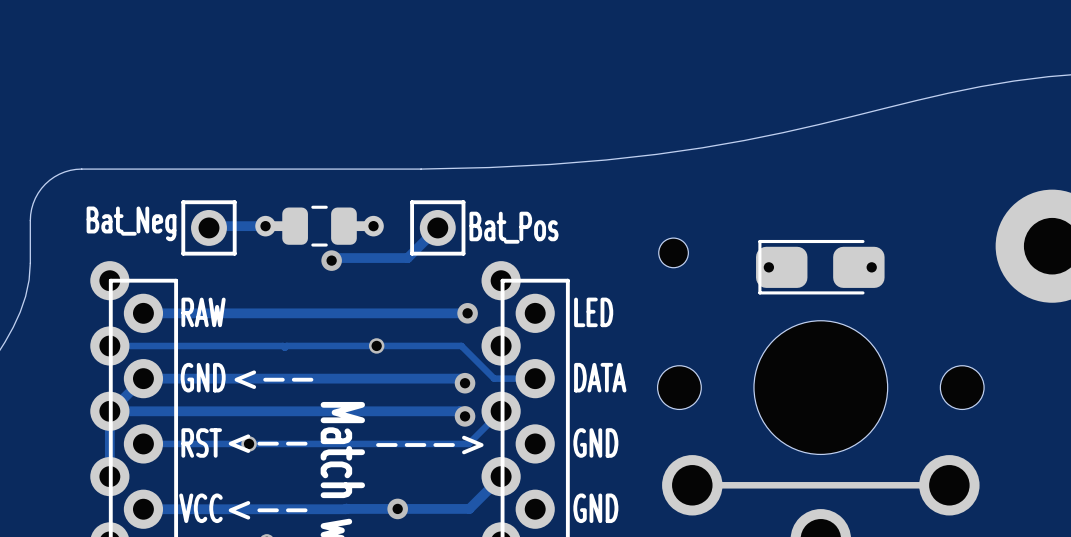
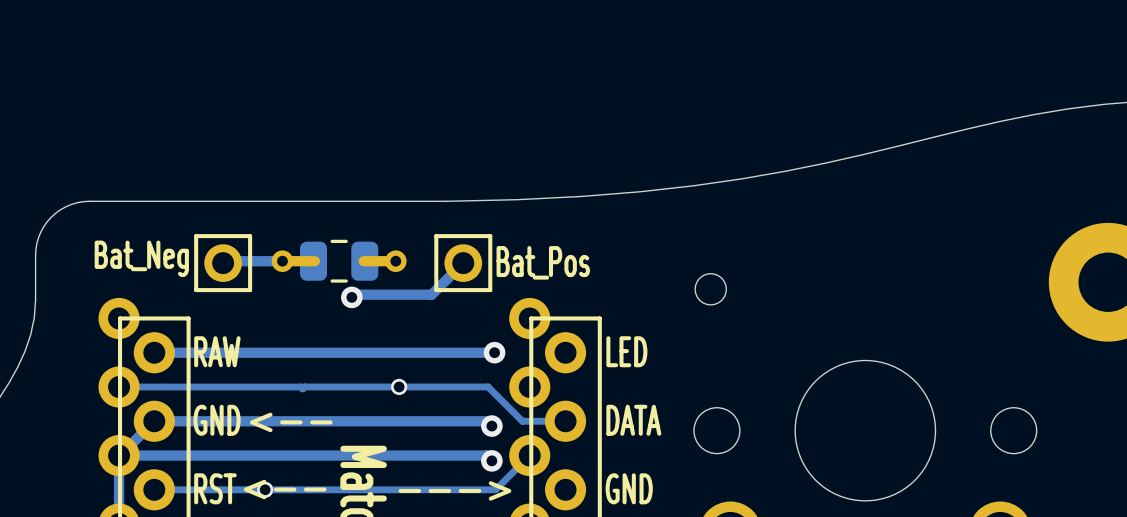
part: (820, 267) -> none

